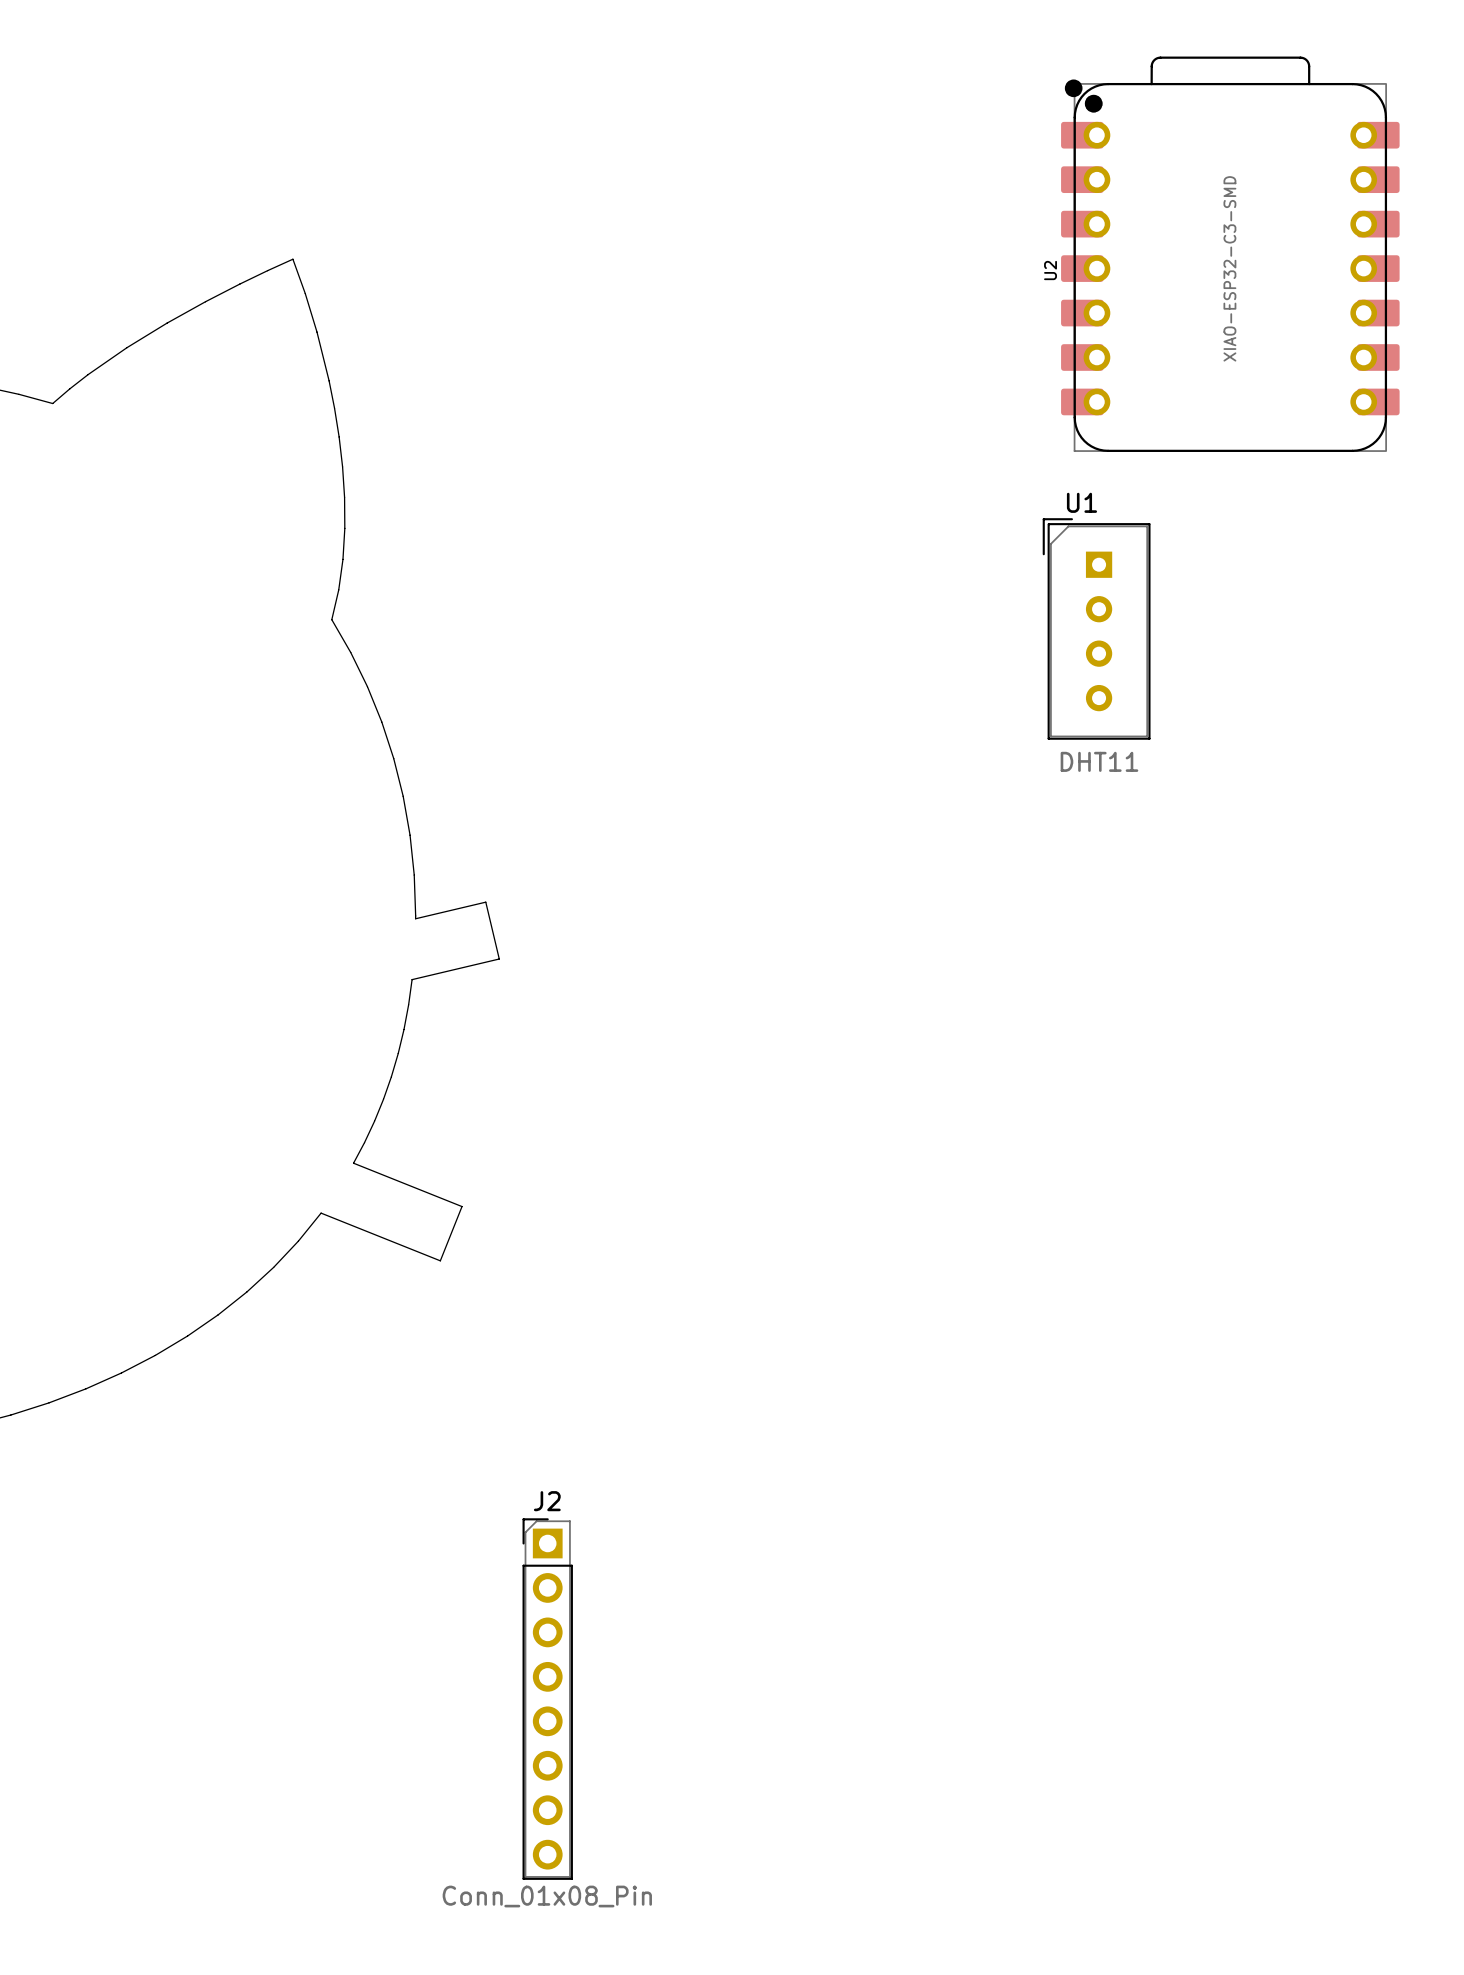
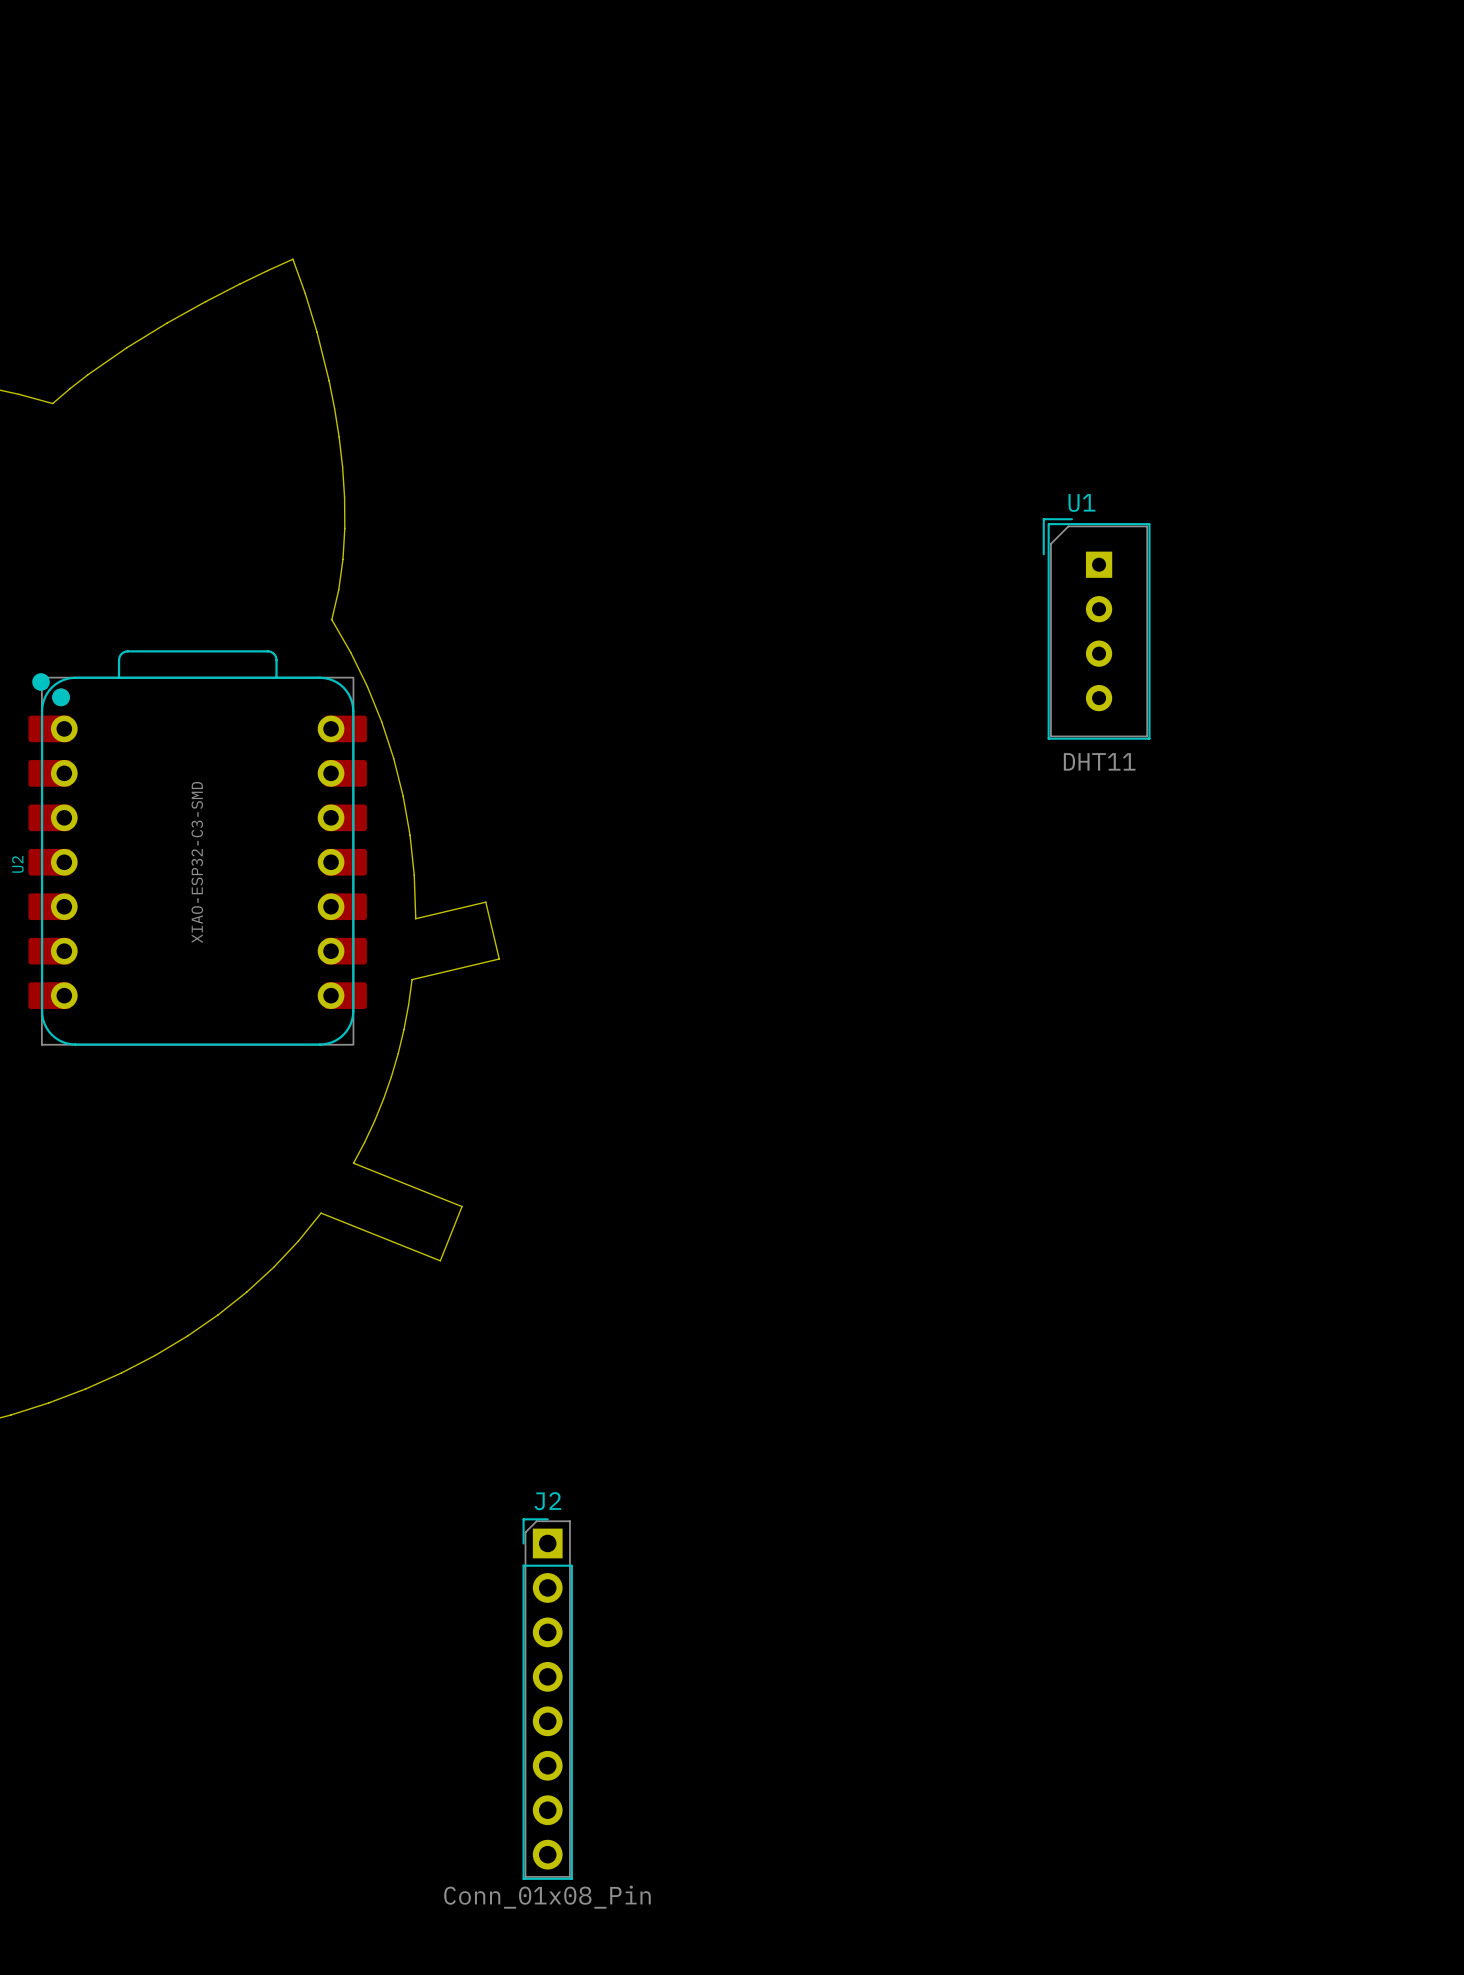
U2 position: (1230, 254) -> (197, 847)

